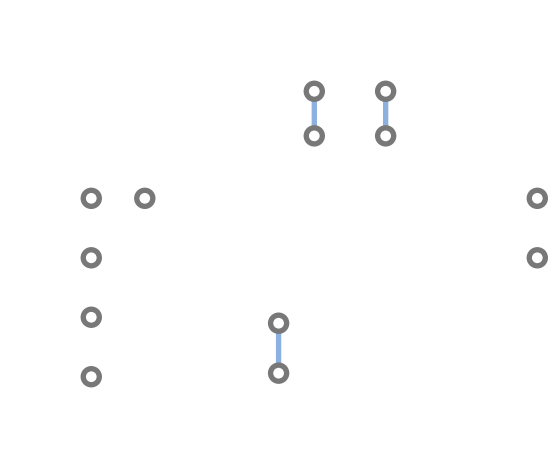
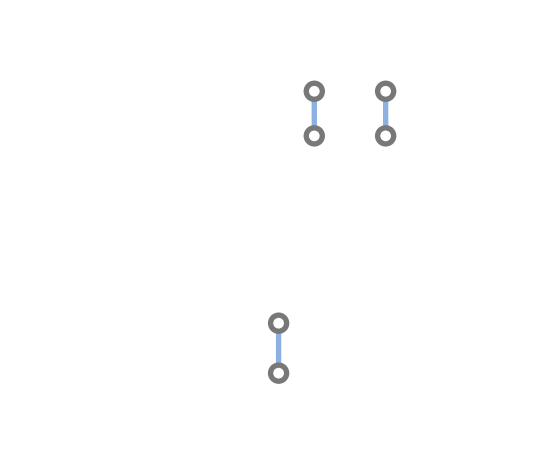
via: (91, 198) -> none
via: (144, 198) -> none
via: (537, 198) -> none
via: (91, 257) -> none
via: (537, 257) -> none
via: (91, 317) -> none
via: (91, 376) -> none

